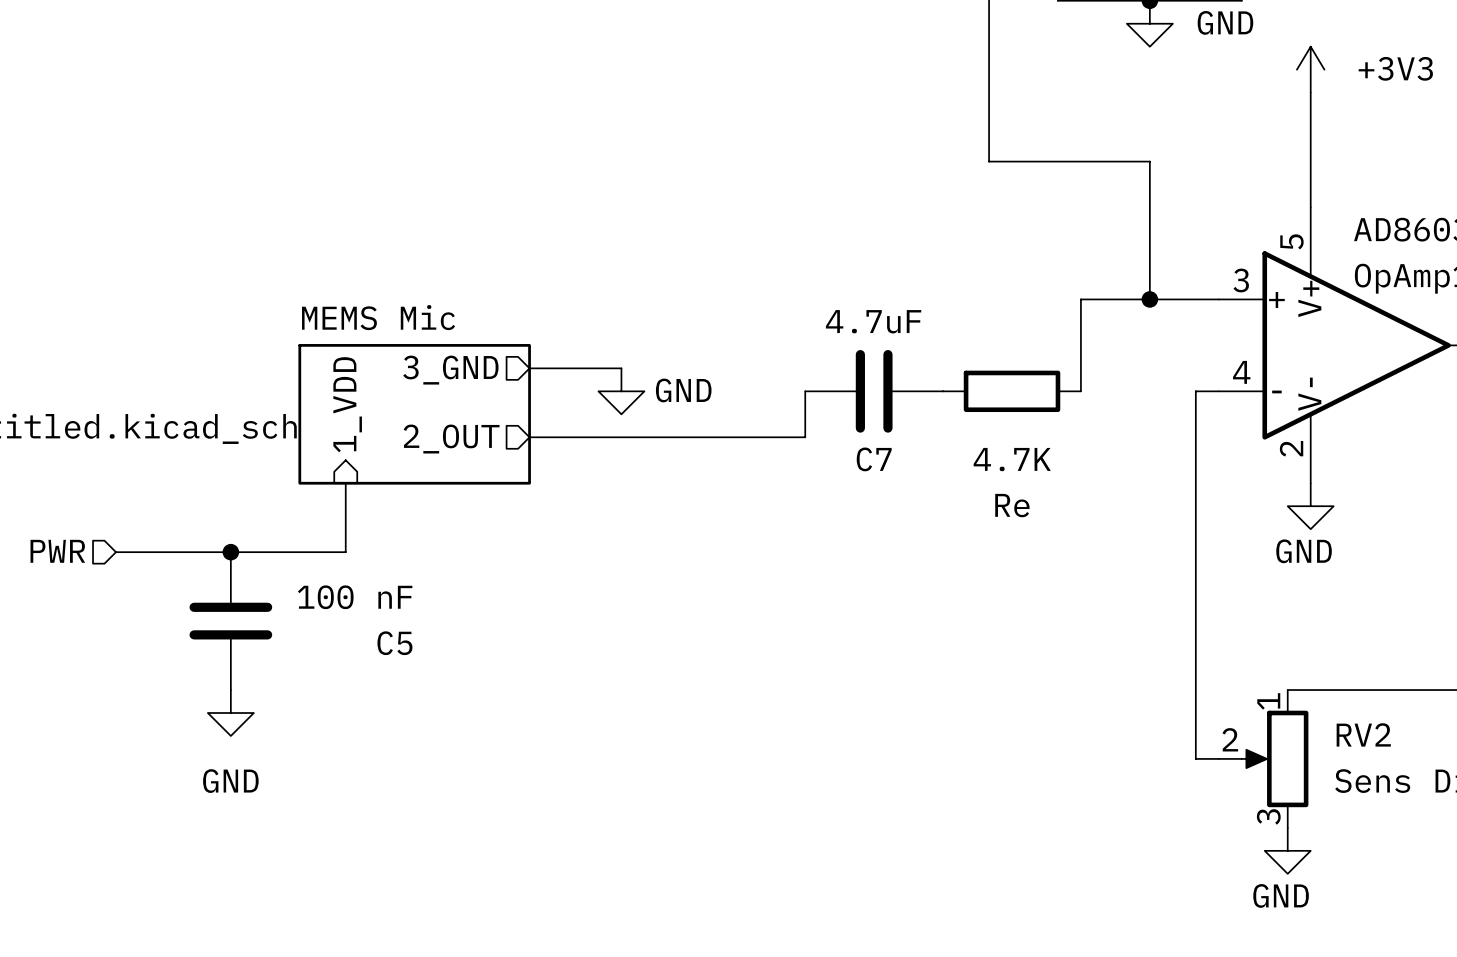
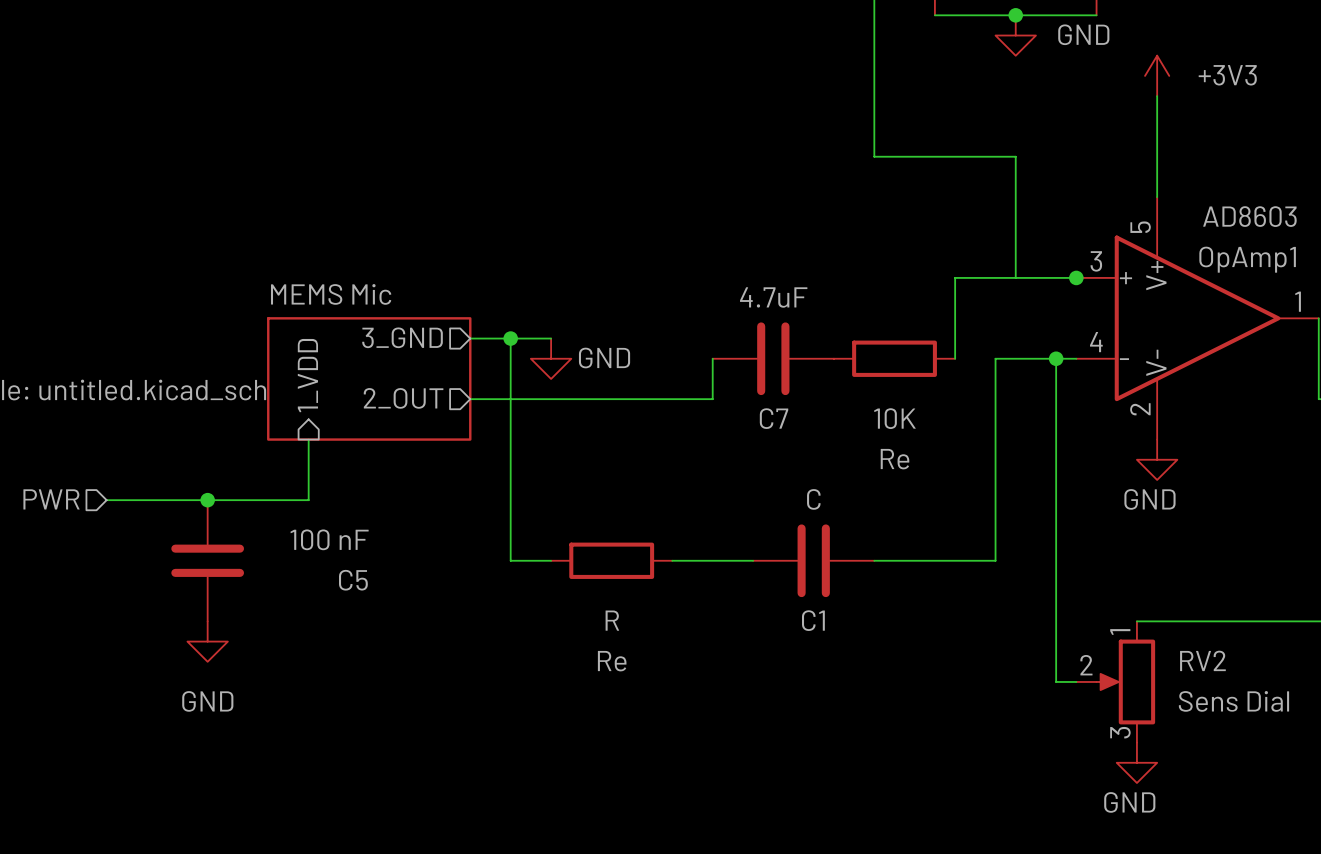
junction: (1149, 299) -> none
junction: none -> (1076, 277)
wire: none -> (510, 338) (510, 560) (551, 560)
junction: none -> (510, 338)
wire: none -> (1056, 358) (995, 358) (995, 560) (874, 560)
junction: none -> (1056, 358)
Re value: 4.7K (1012, 459) -> 10K (894, 418)
Re: none -> R (611, 560)
wire: none -> (672, 560) (753, 560)
C1: none -> C (813, 560)

